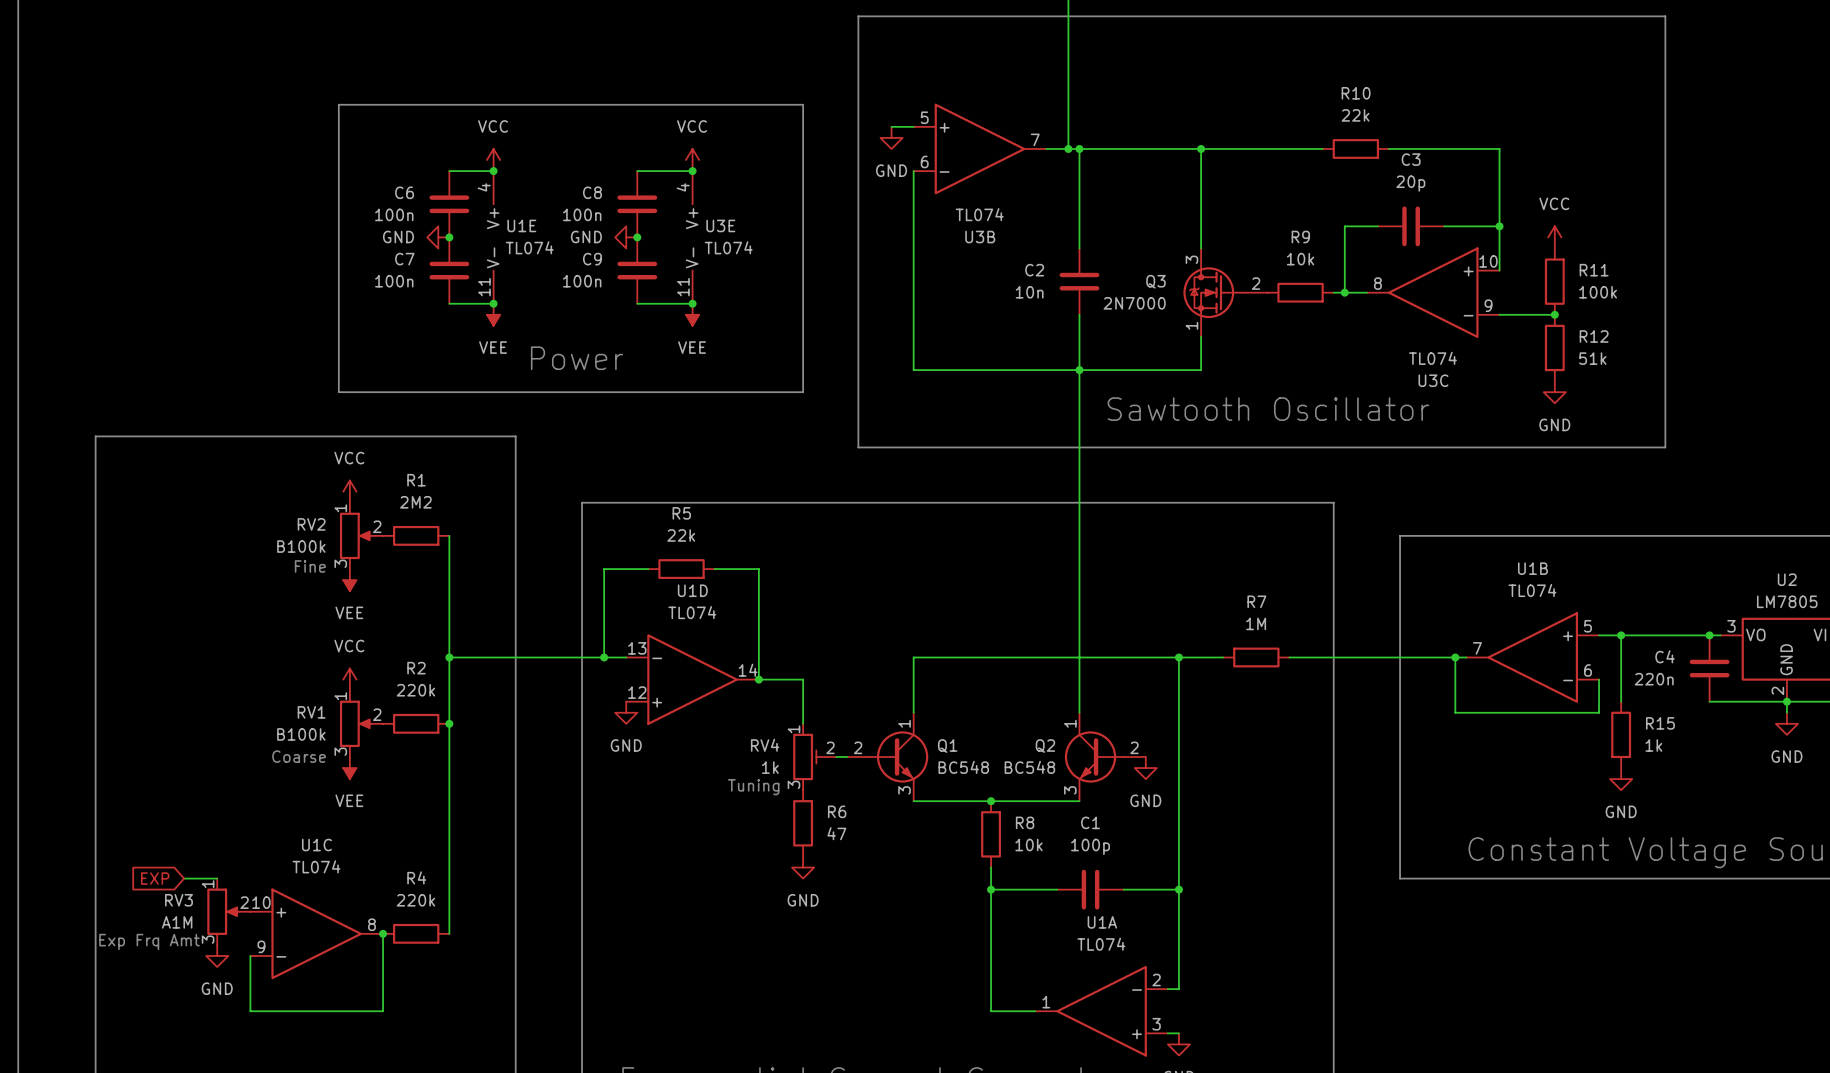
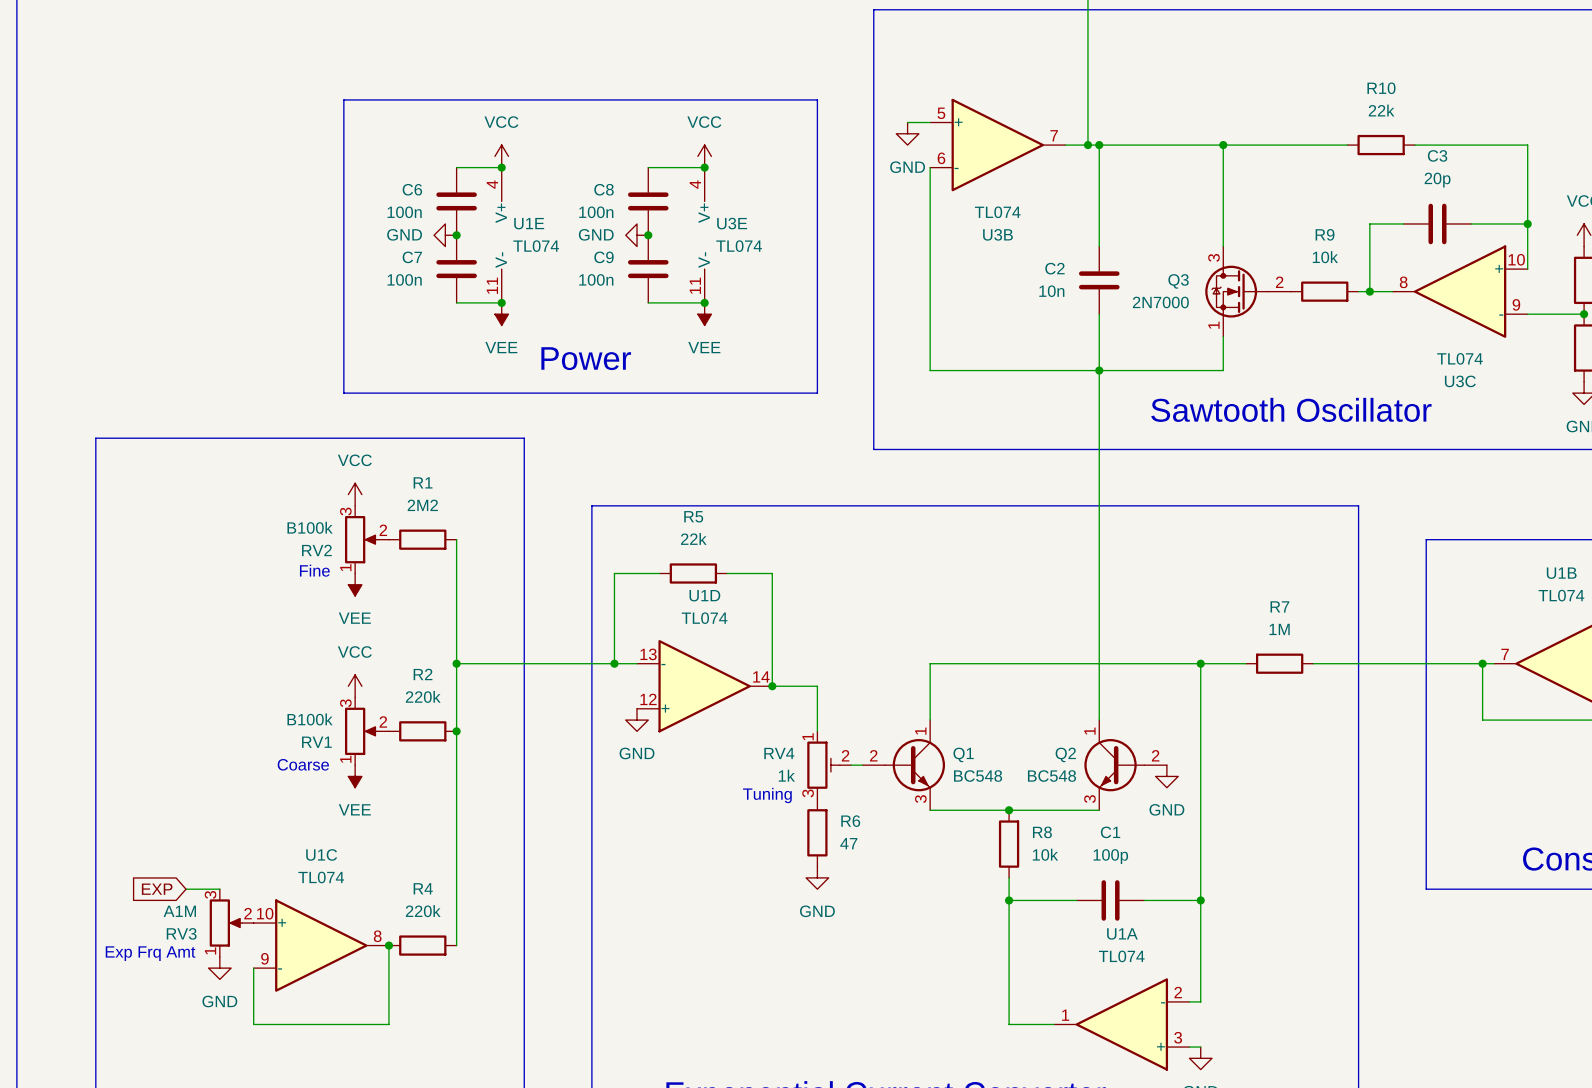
RV2 flip: as is (355, 535) -> up-down (361, 539)
RV1 flip: as is (355, 723) -> up-down (361, 731)
RV3 flip: as is (223, 911) -> up-down (226, 923)

